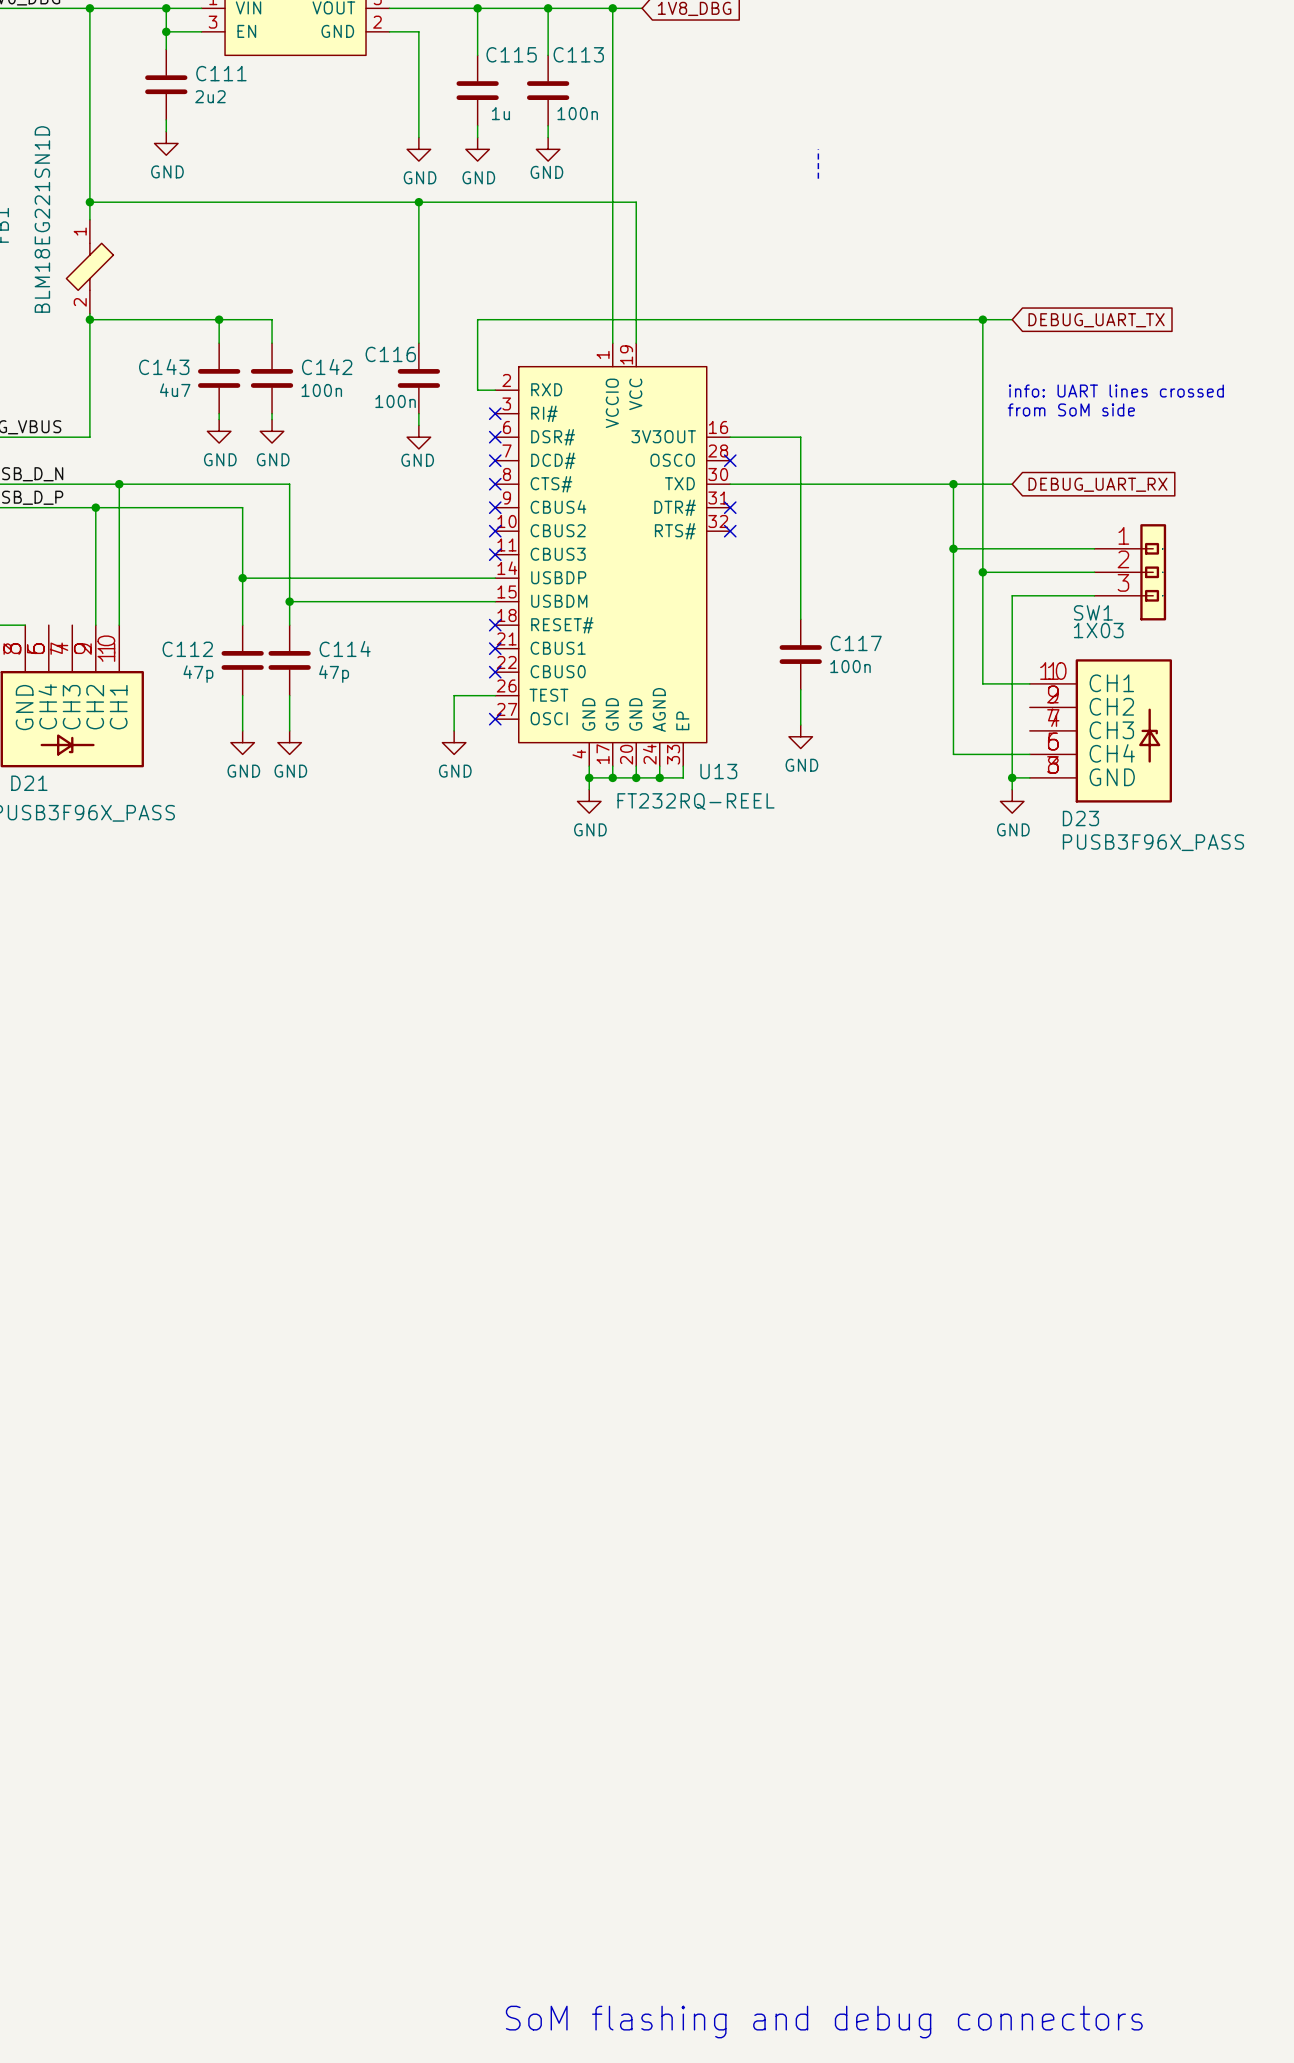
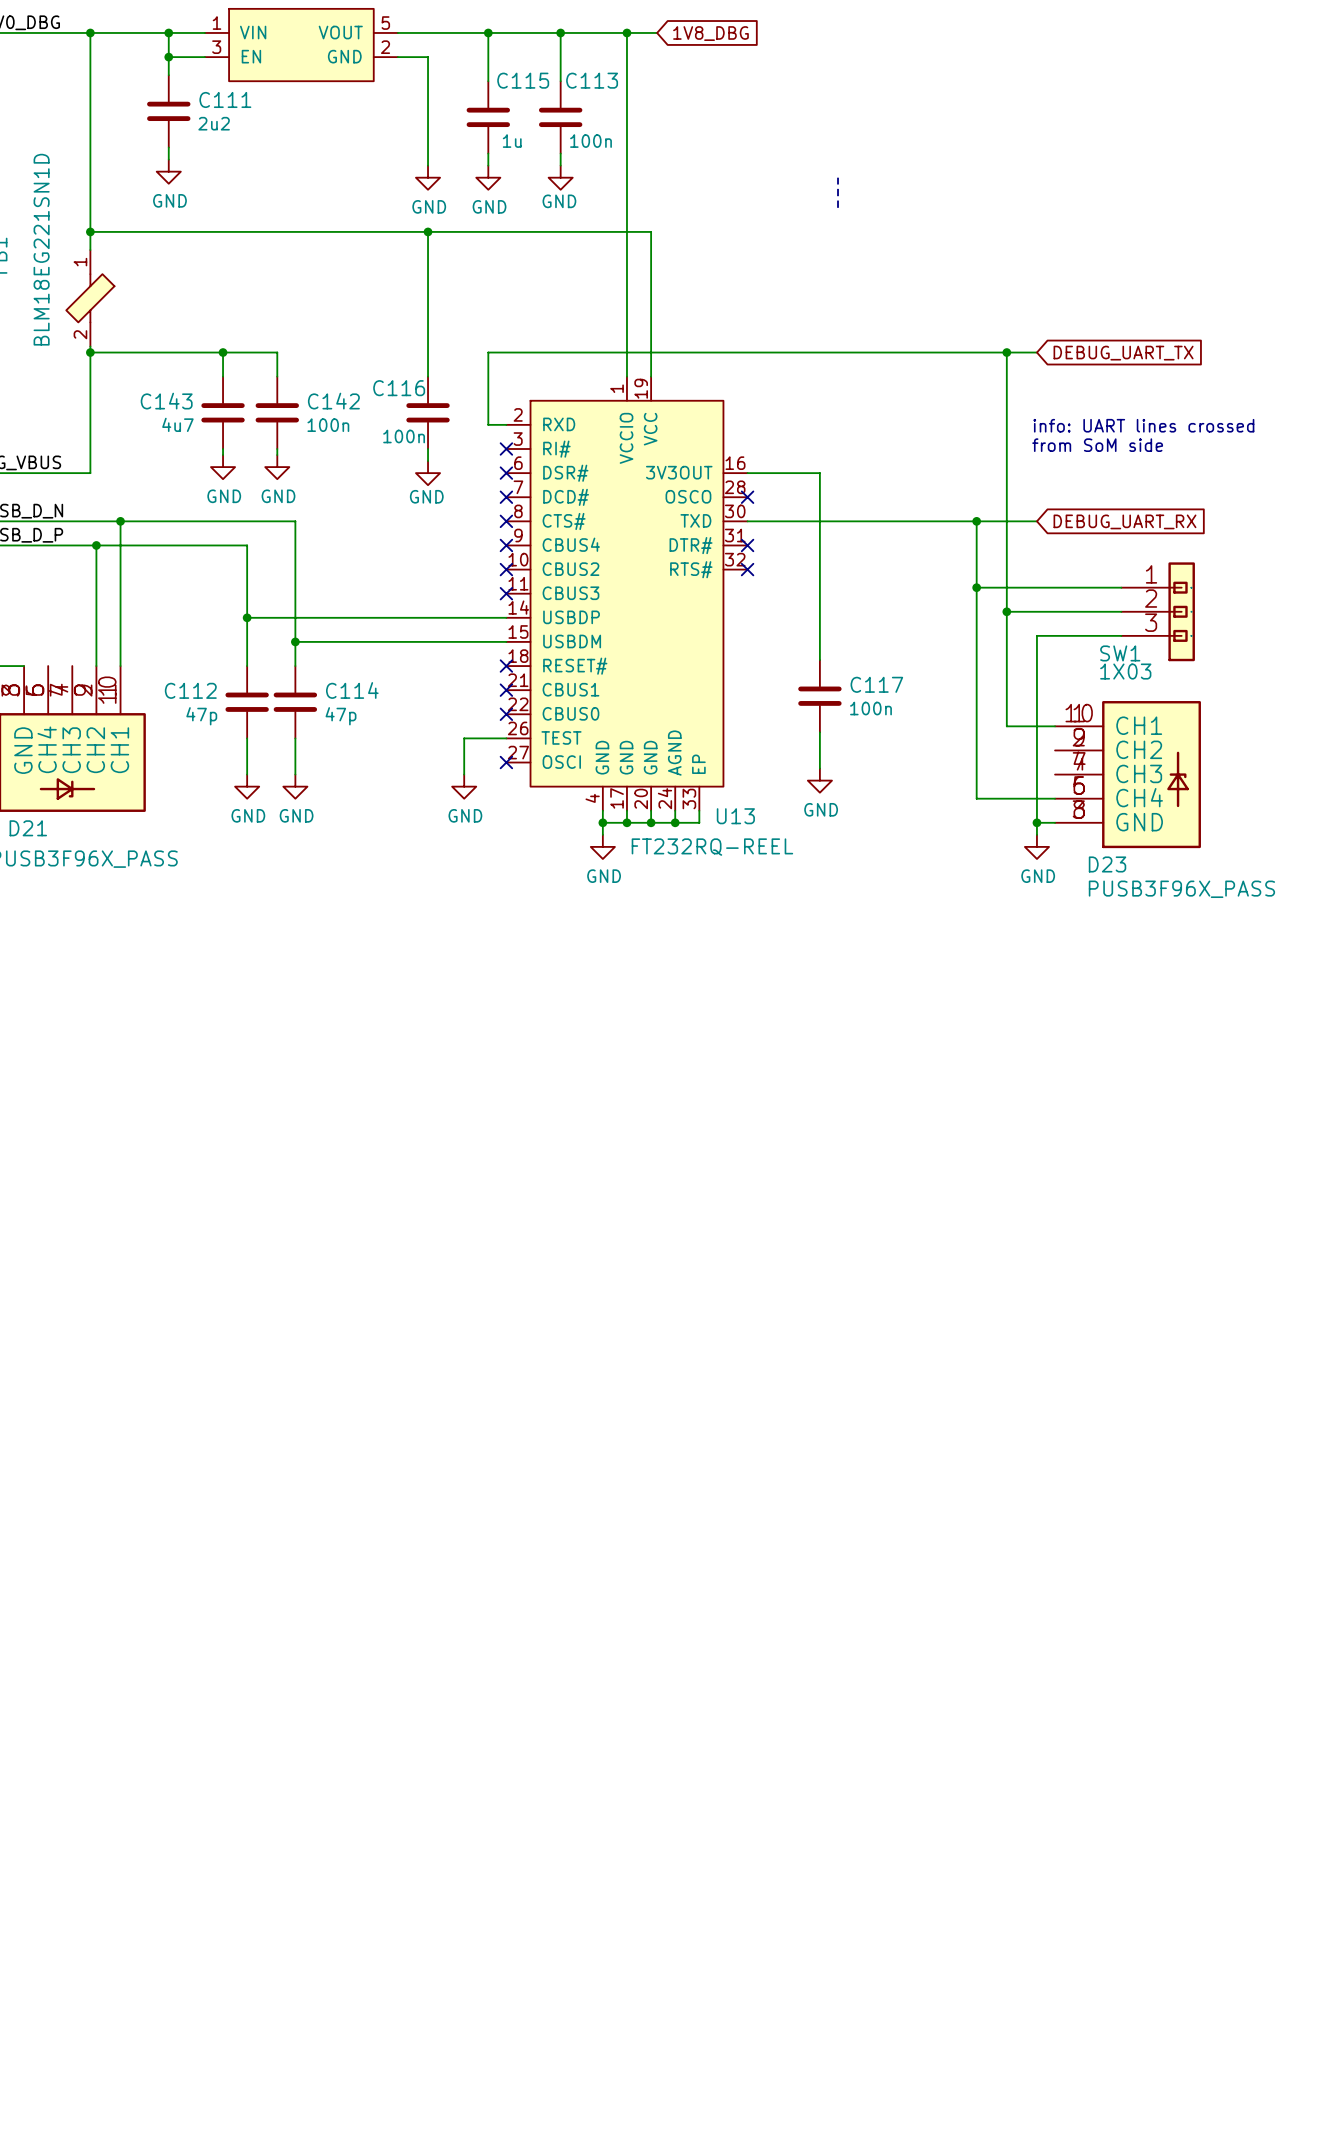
text: SoM flashing and debug connectors (824, 2022) -> none

